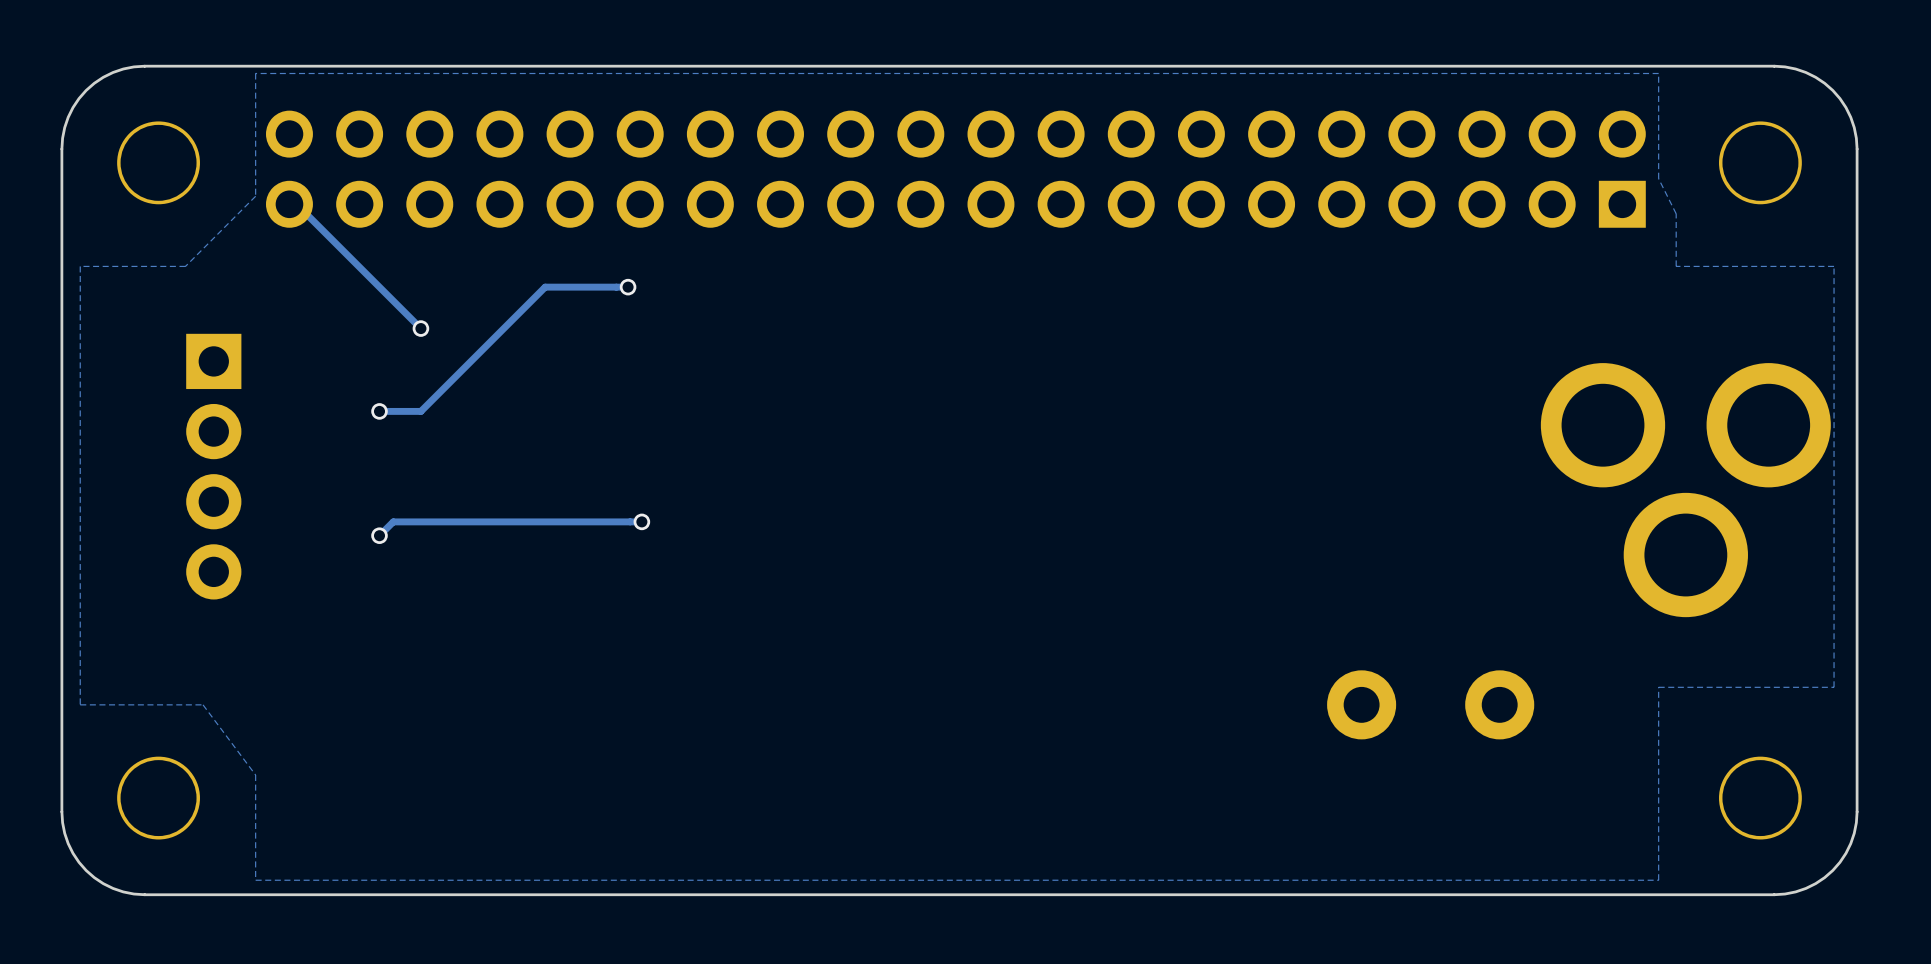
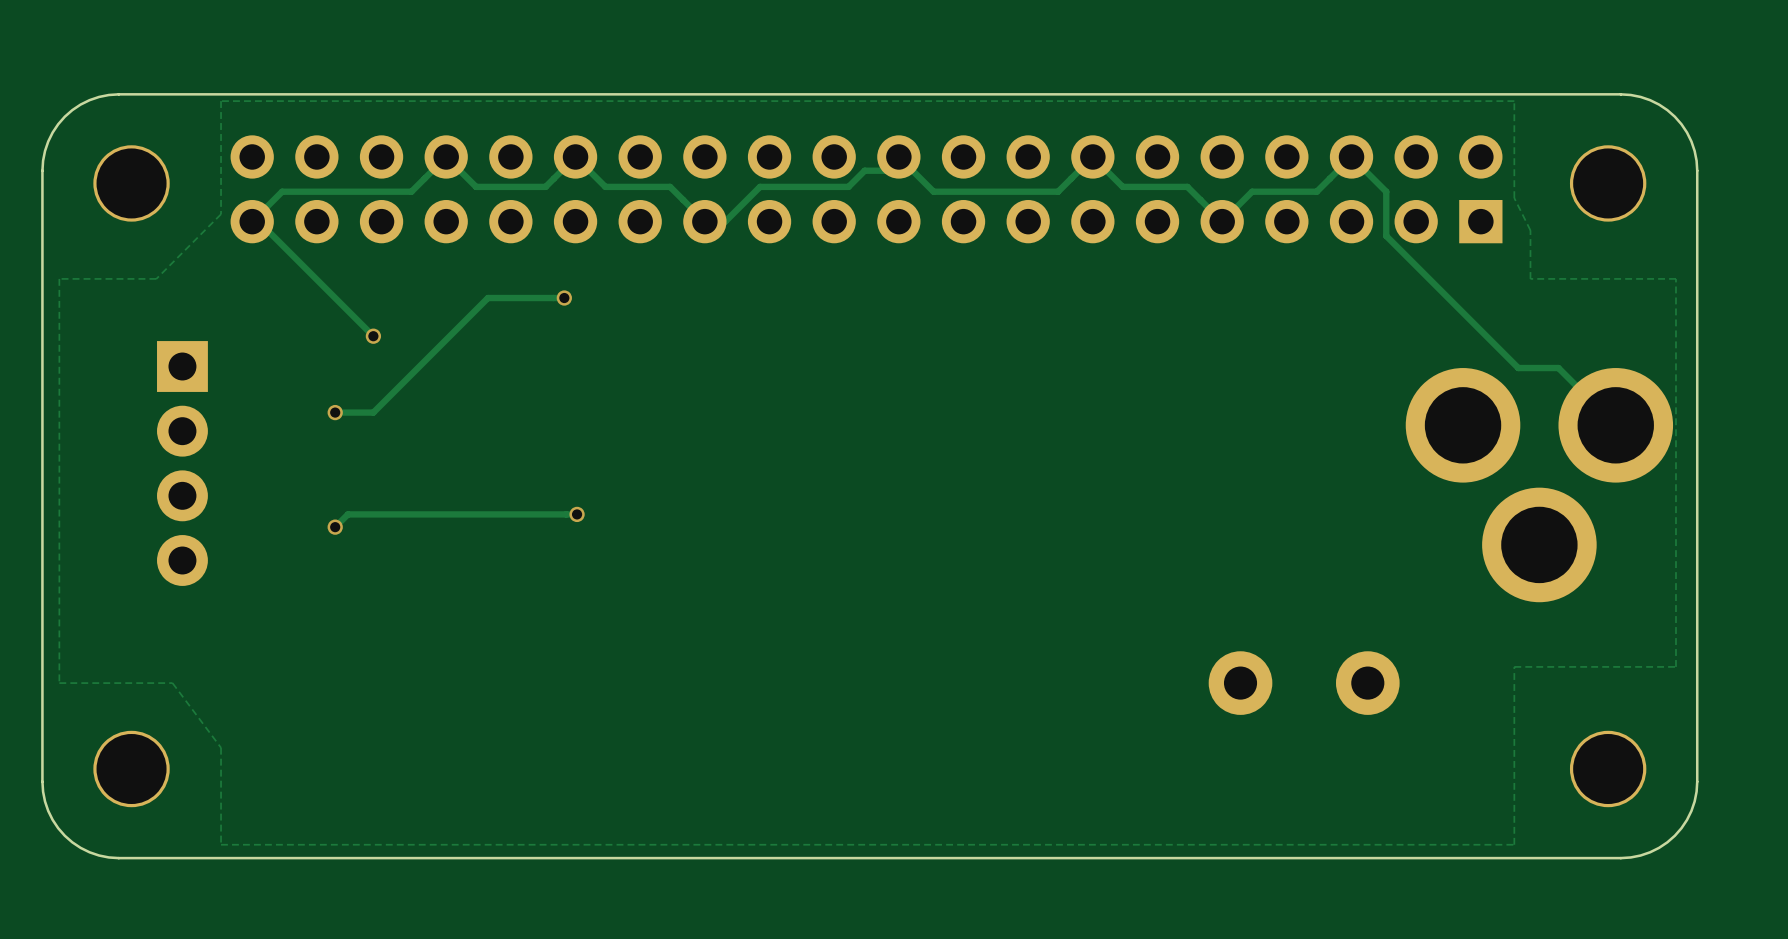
track: none -> (252, 221) (282, 191) (411, 191) (446, 156) (476, 186) (545, 186) (575, 156) (605, 186) (670, 186) (704, 221) (725, 221) (760, 186) (848, 186) (864, 170) (885, 170) (898, 156) (933, 191) (1058, 191) (1092, 156) (1122, 186) (1187, 186) (1222, 221) (1252, 191) (1316, 191) (1351, 156) (1386, 191) (1386, 236) (1518, 368) (1558, 368) (1615, 425)

